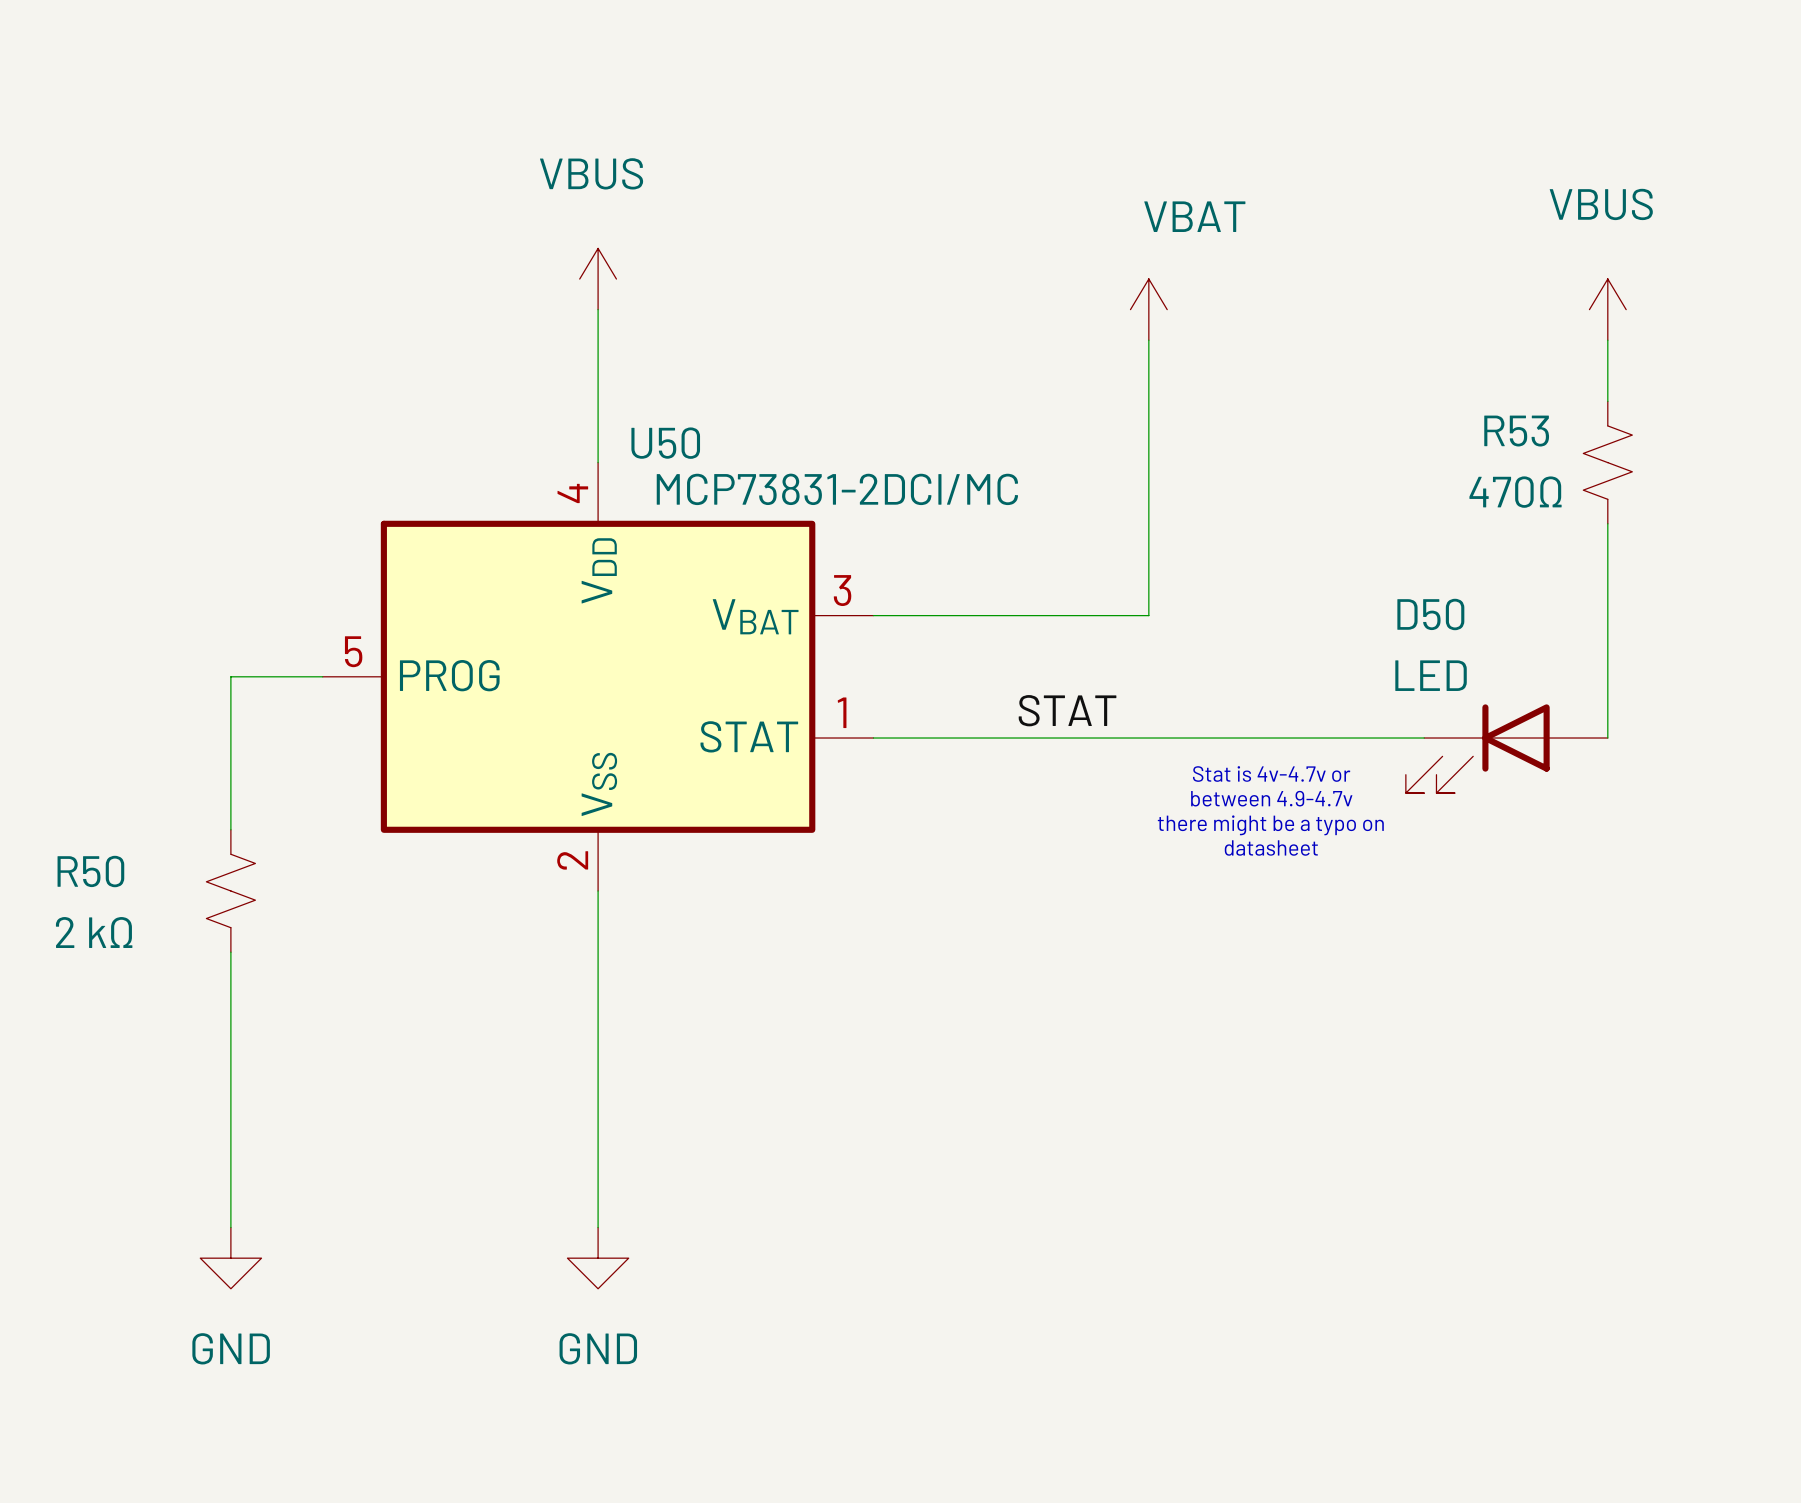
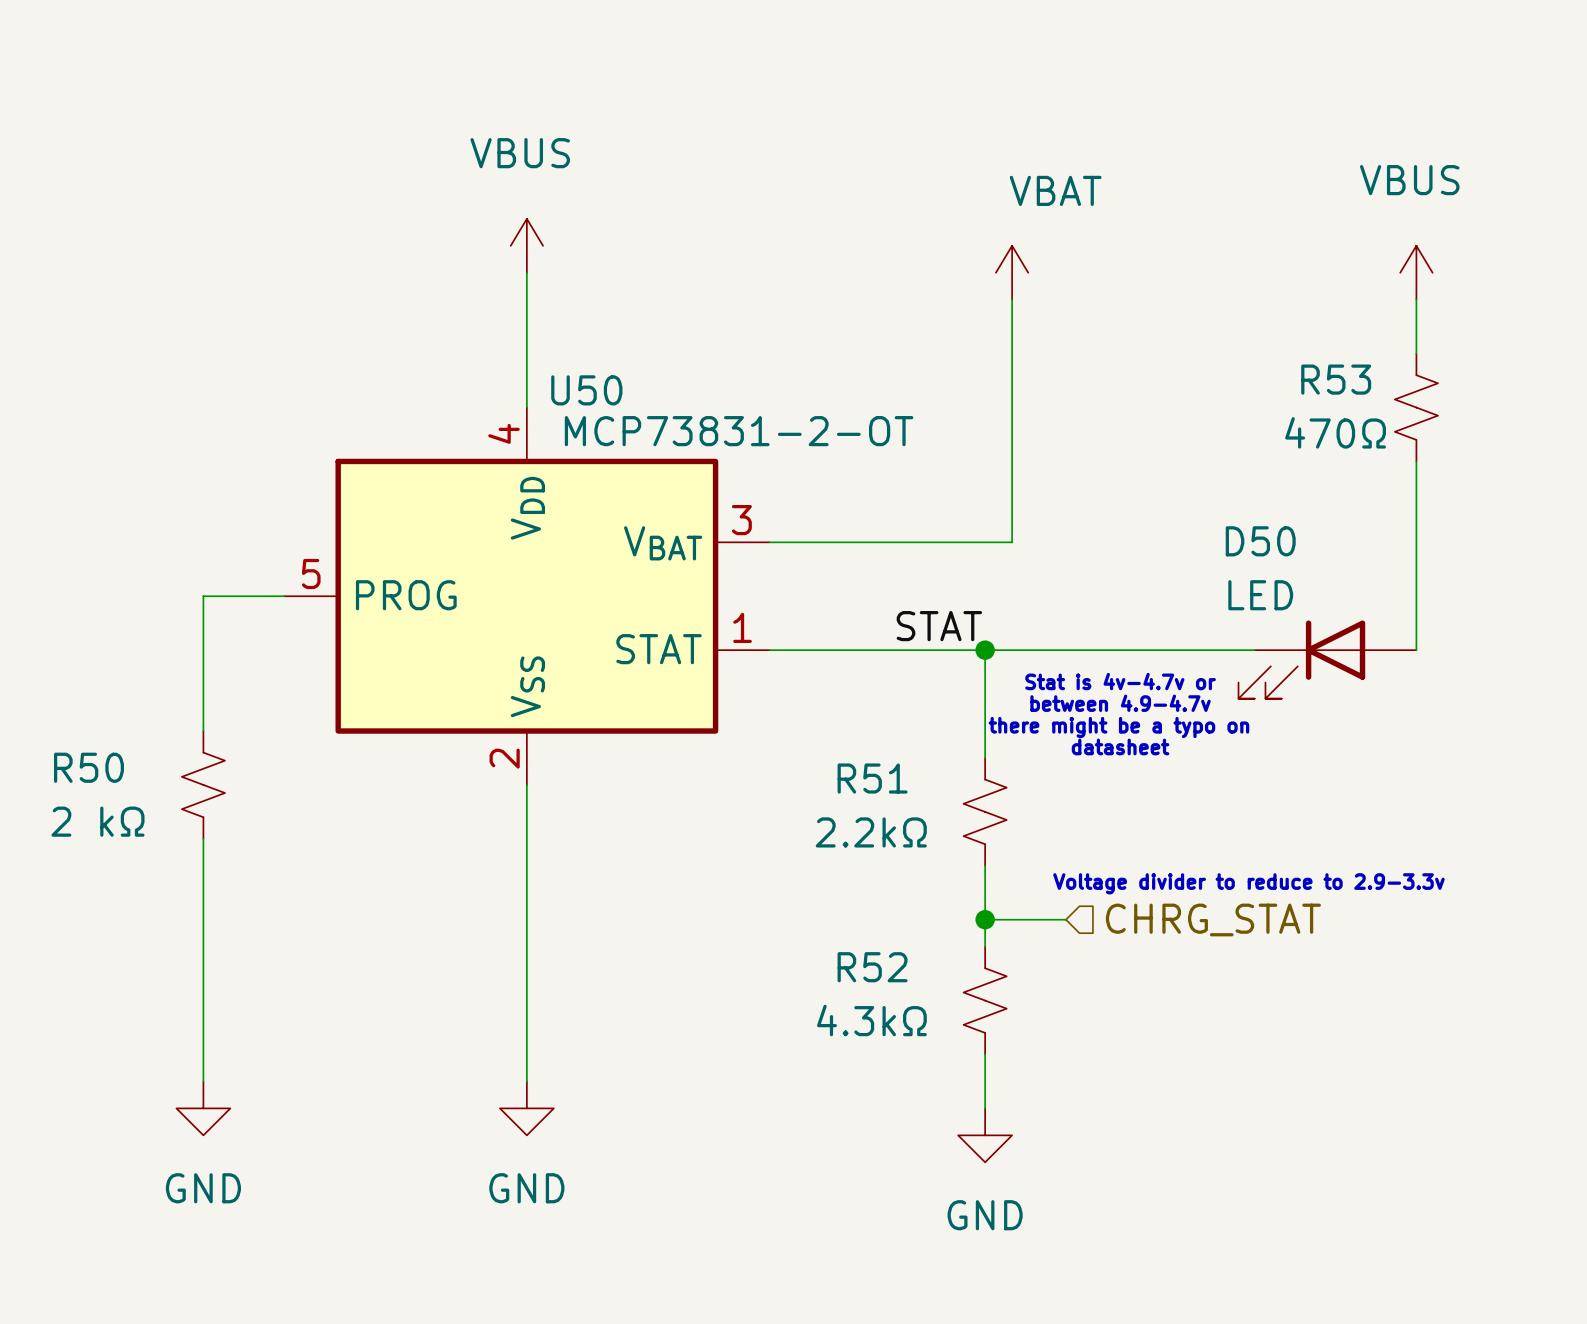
U50 value: MCP73831-2DCI/MC (837, 489) -> MCP73831-2-OT (739, 431)
wire: none -> (985, 650) (985, 757)
junction: none -> (985, 650)
R51: none -> 2.2kΩ (985, 811)
wire: none -> (985, 865) (985, 946)
text: none -> Voltage divider to reduce to 2.9-3.3v (1248, 883)
hierarchical label: none -> CHRG_STAT (1213, 919)
wire: none -> (985, 919) (1065, 919)
junction: none -> (985, 919)
R52: none -> 4.3kΩ (985, 1000)
wire: none -> (985, 1054) (985, 1108)
power symbol: none -> GND (985, 1135)

